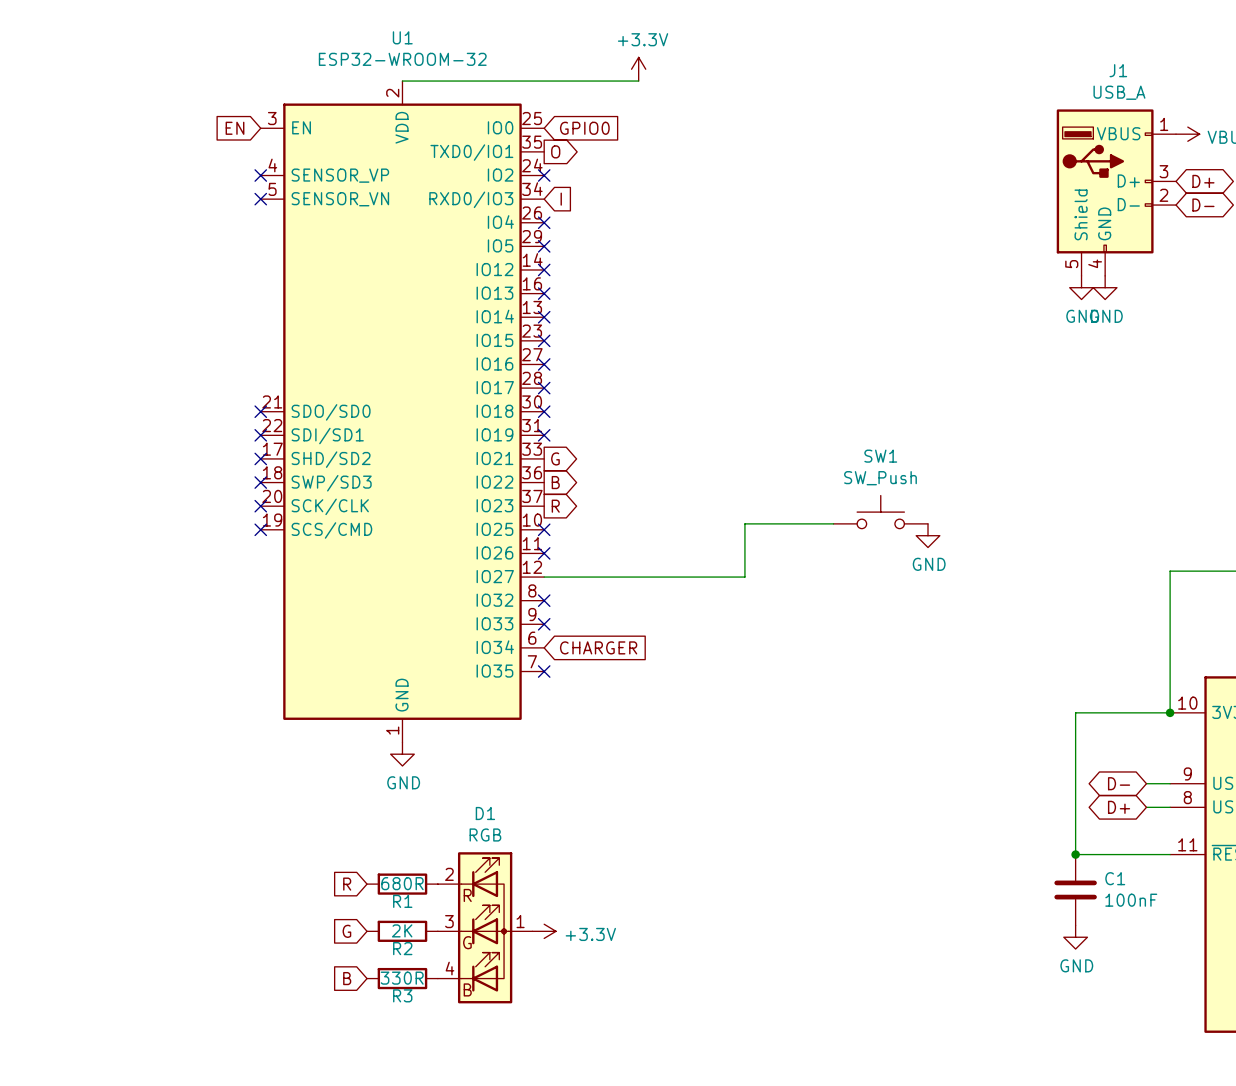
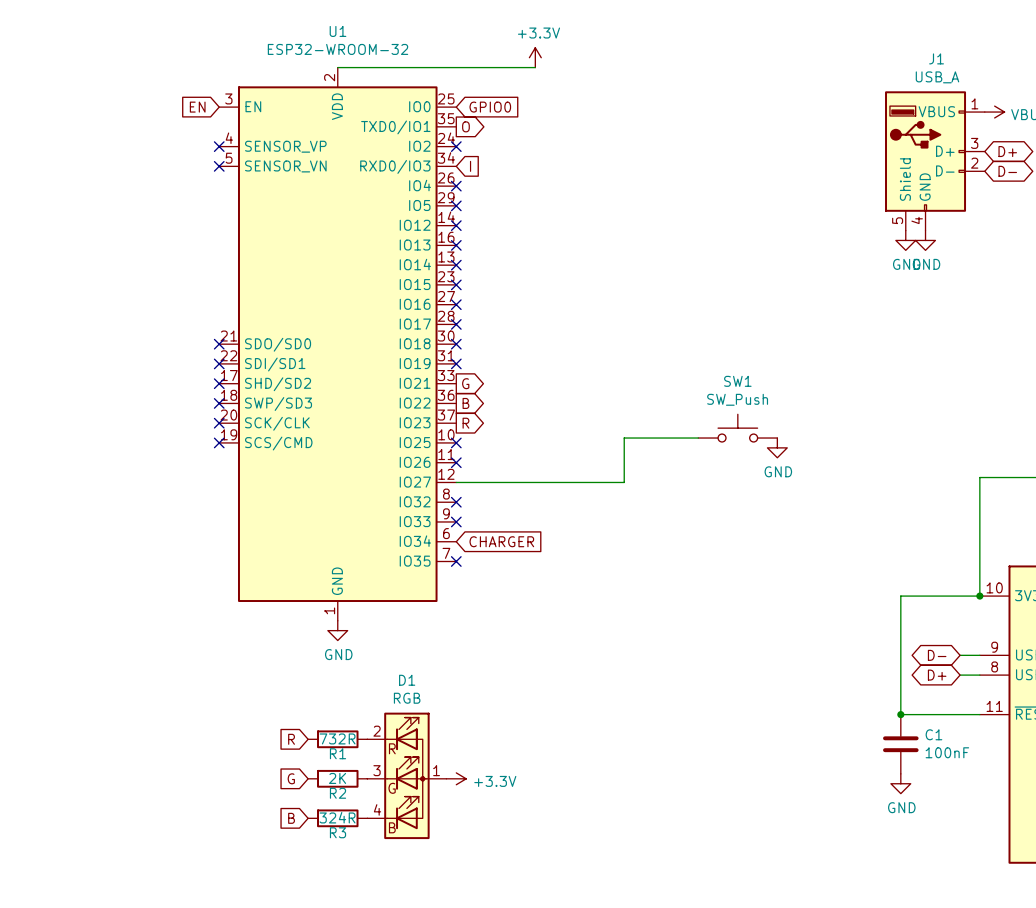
R1 value: 680R (402, 883) -> 732R (337, 738)
R3 value: 330R (402, 978) -> 324R (337, 817)

